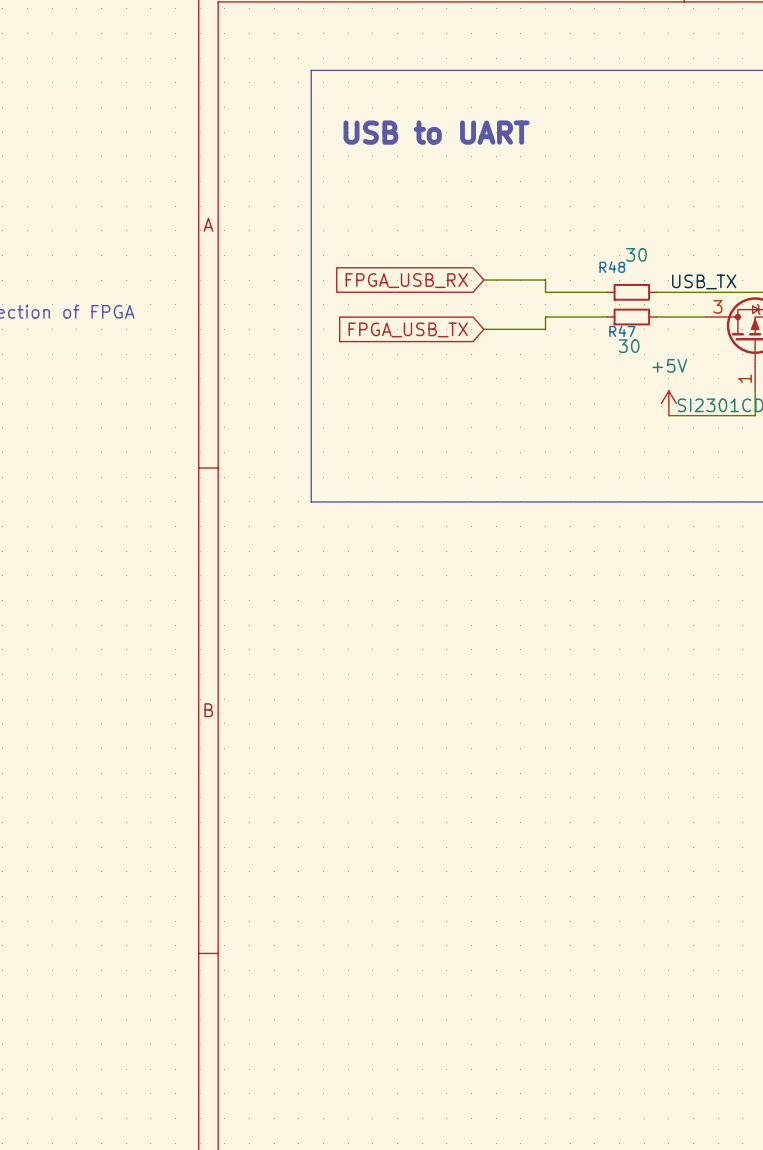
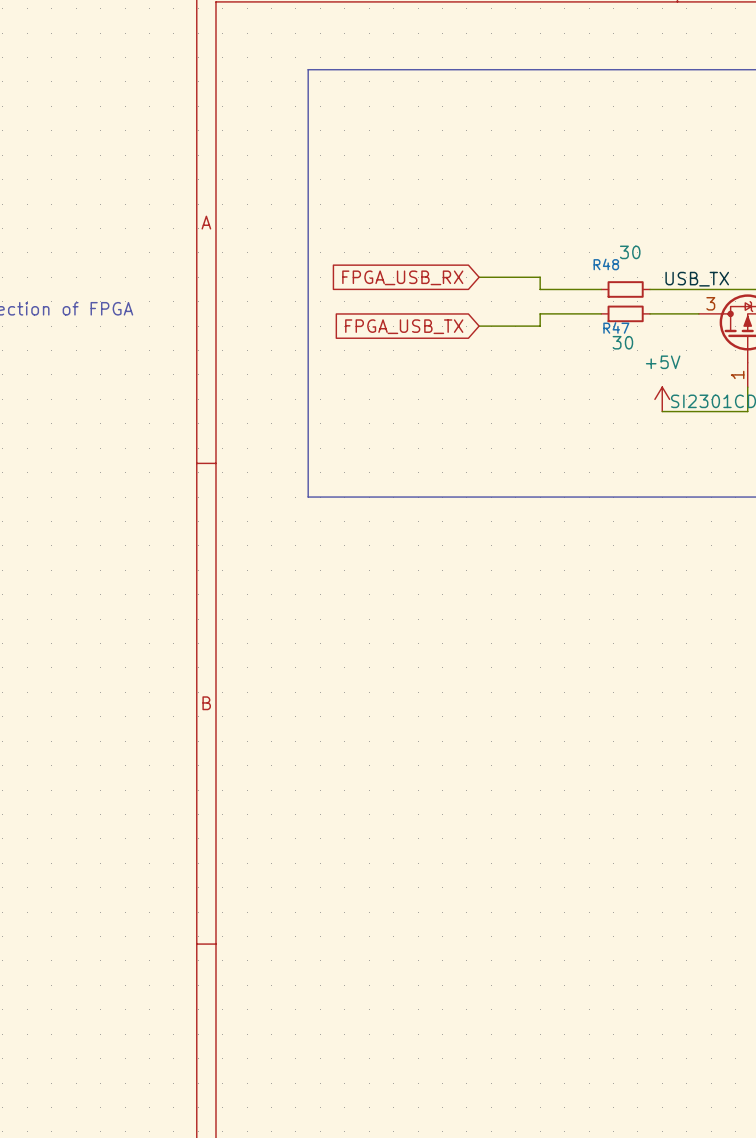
text: USB to UART (436, 132) -> none

